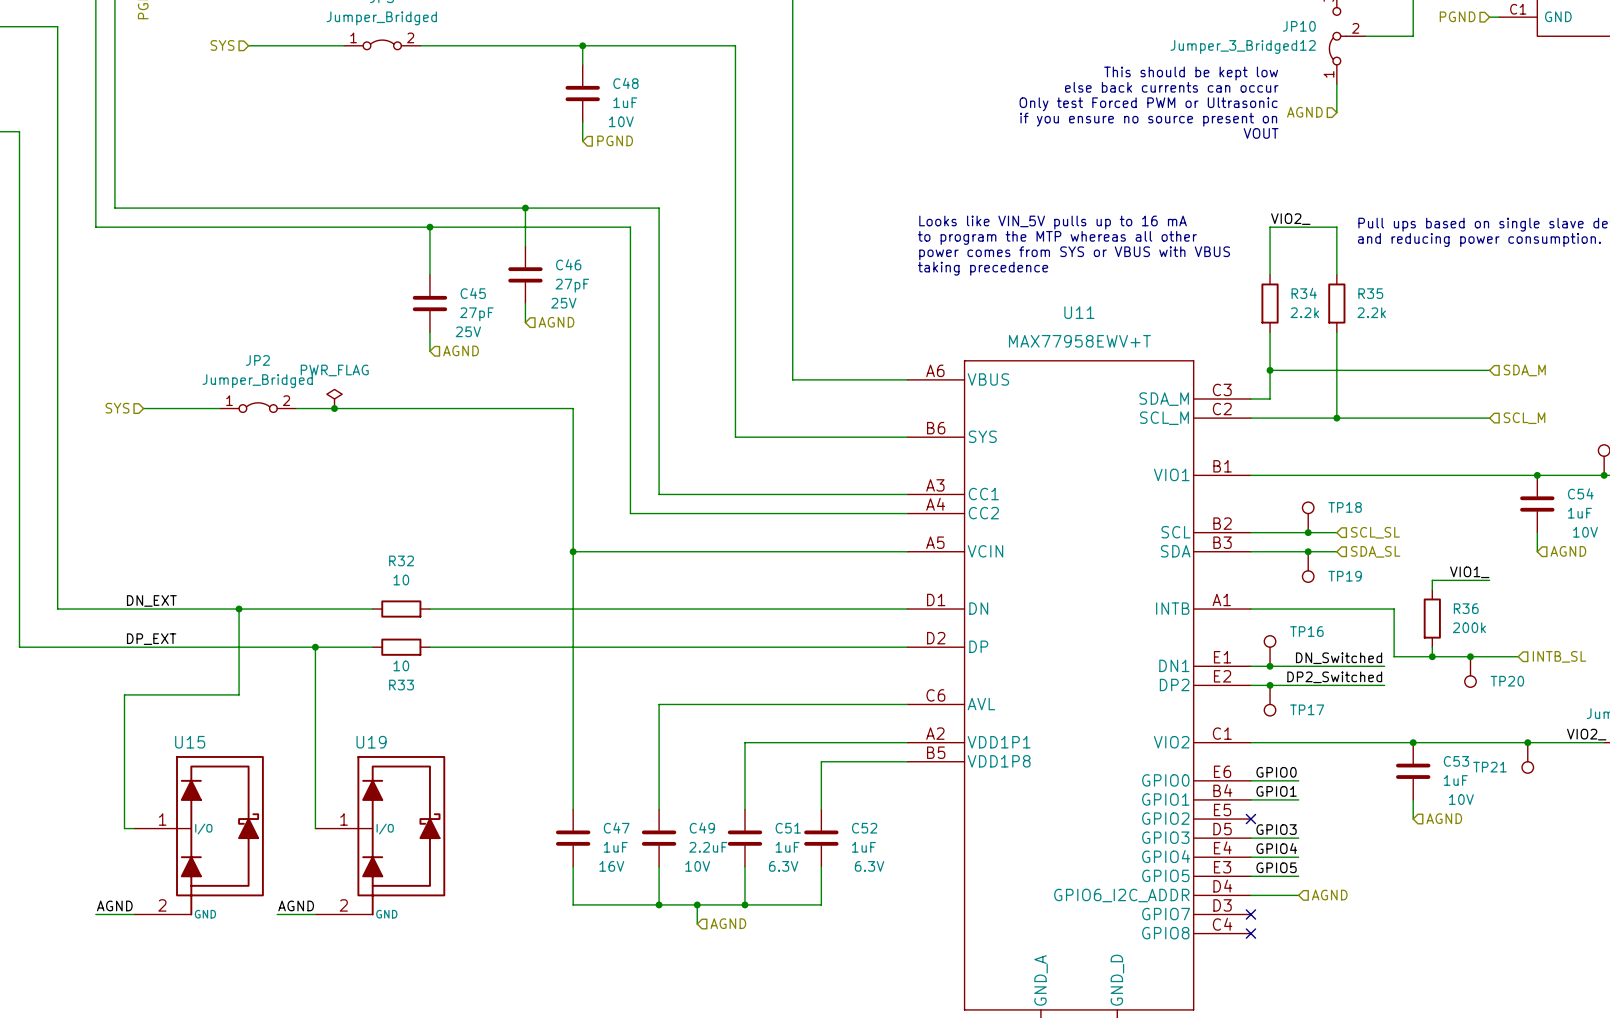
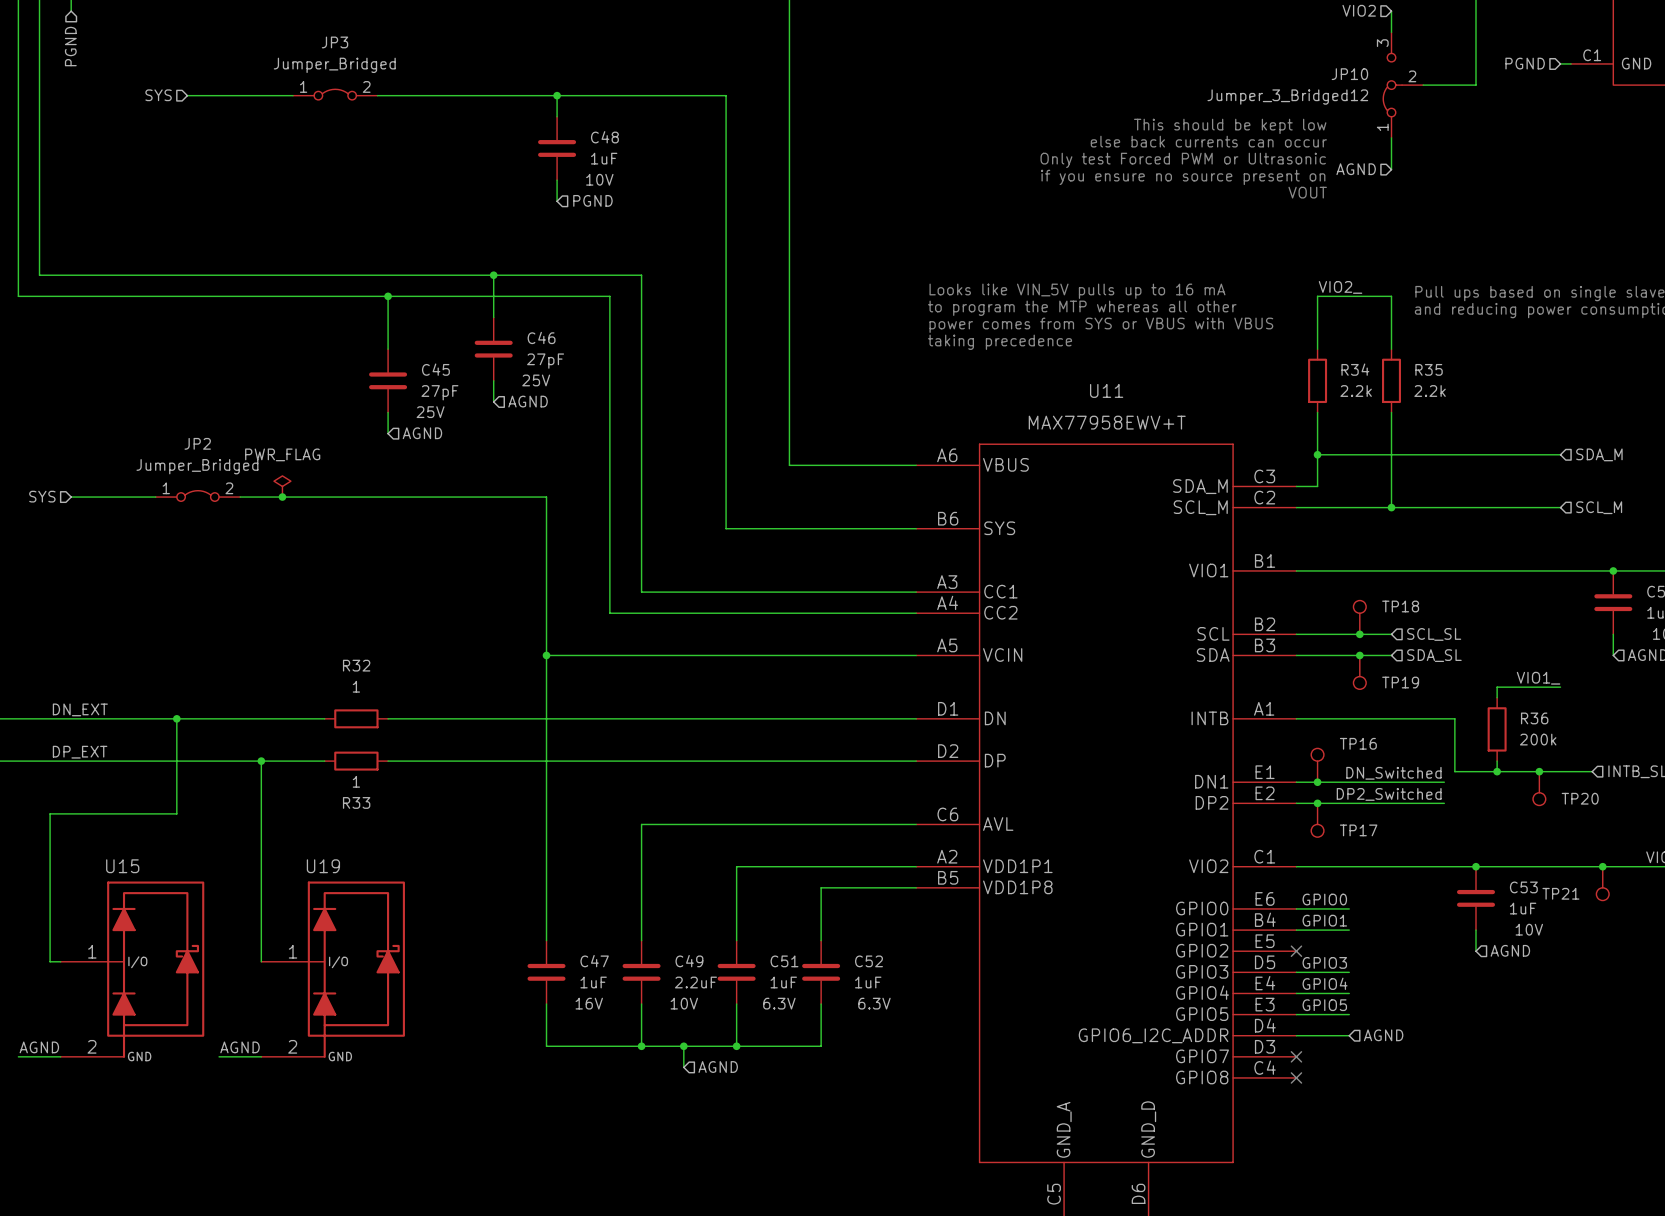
R32 value: 10 (401, 580) -> 1 (356, 686)
R33 value: 10 (401, 665) -> 1 (356, 781)

